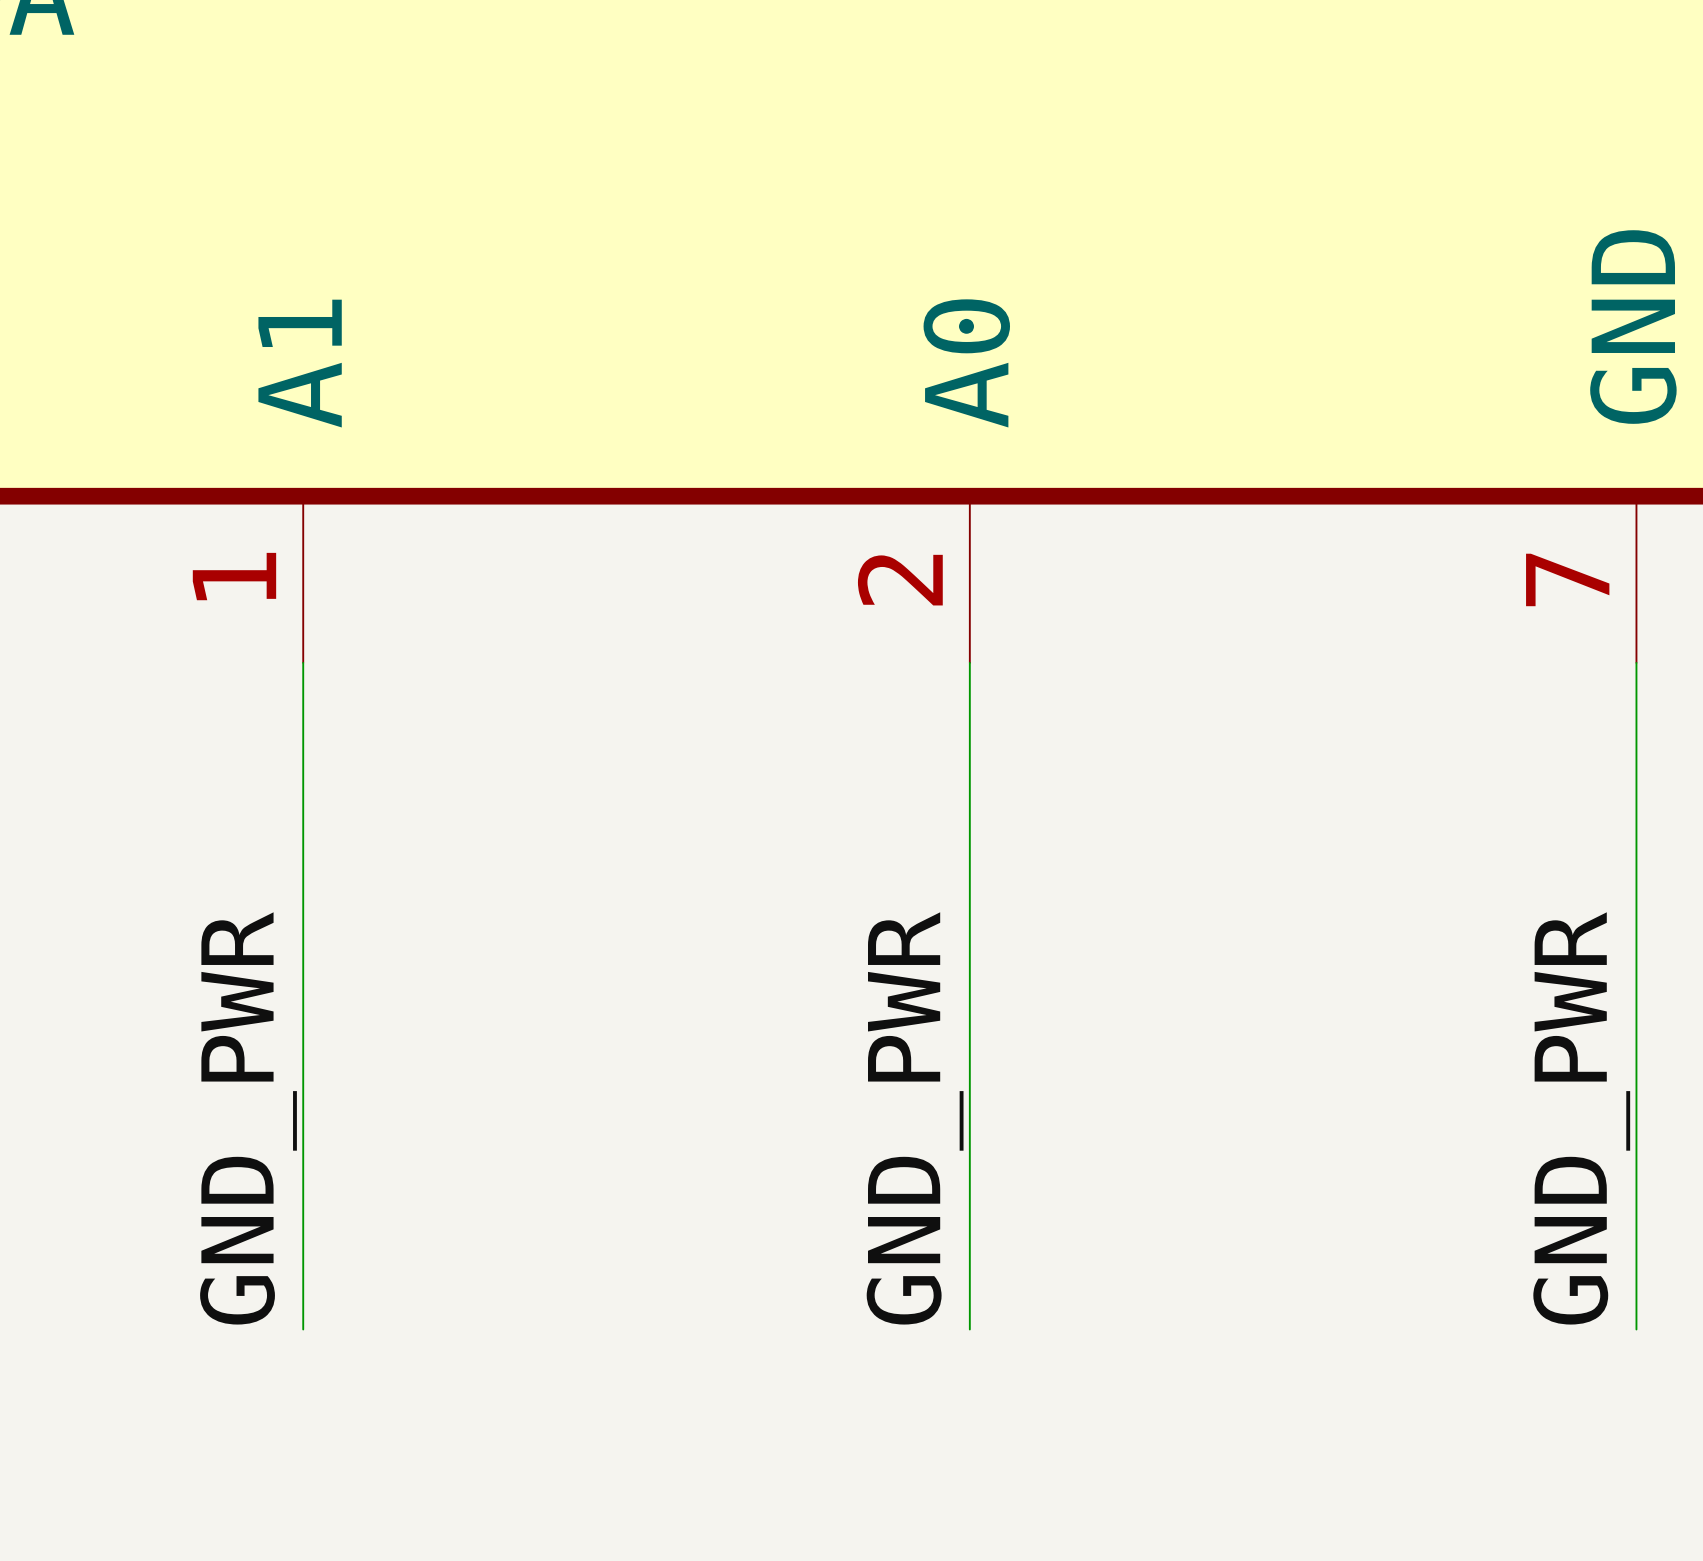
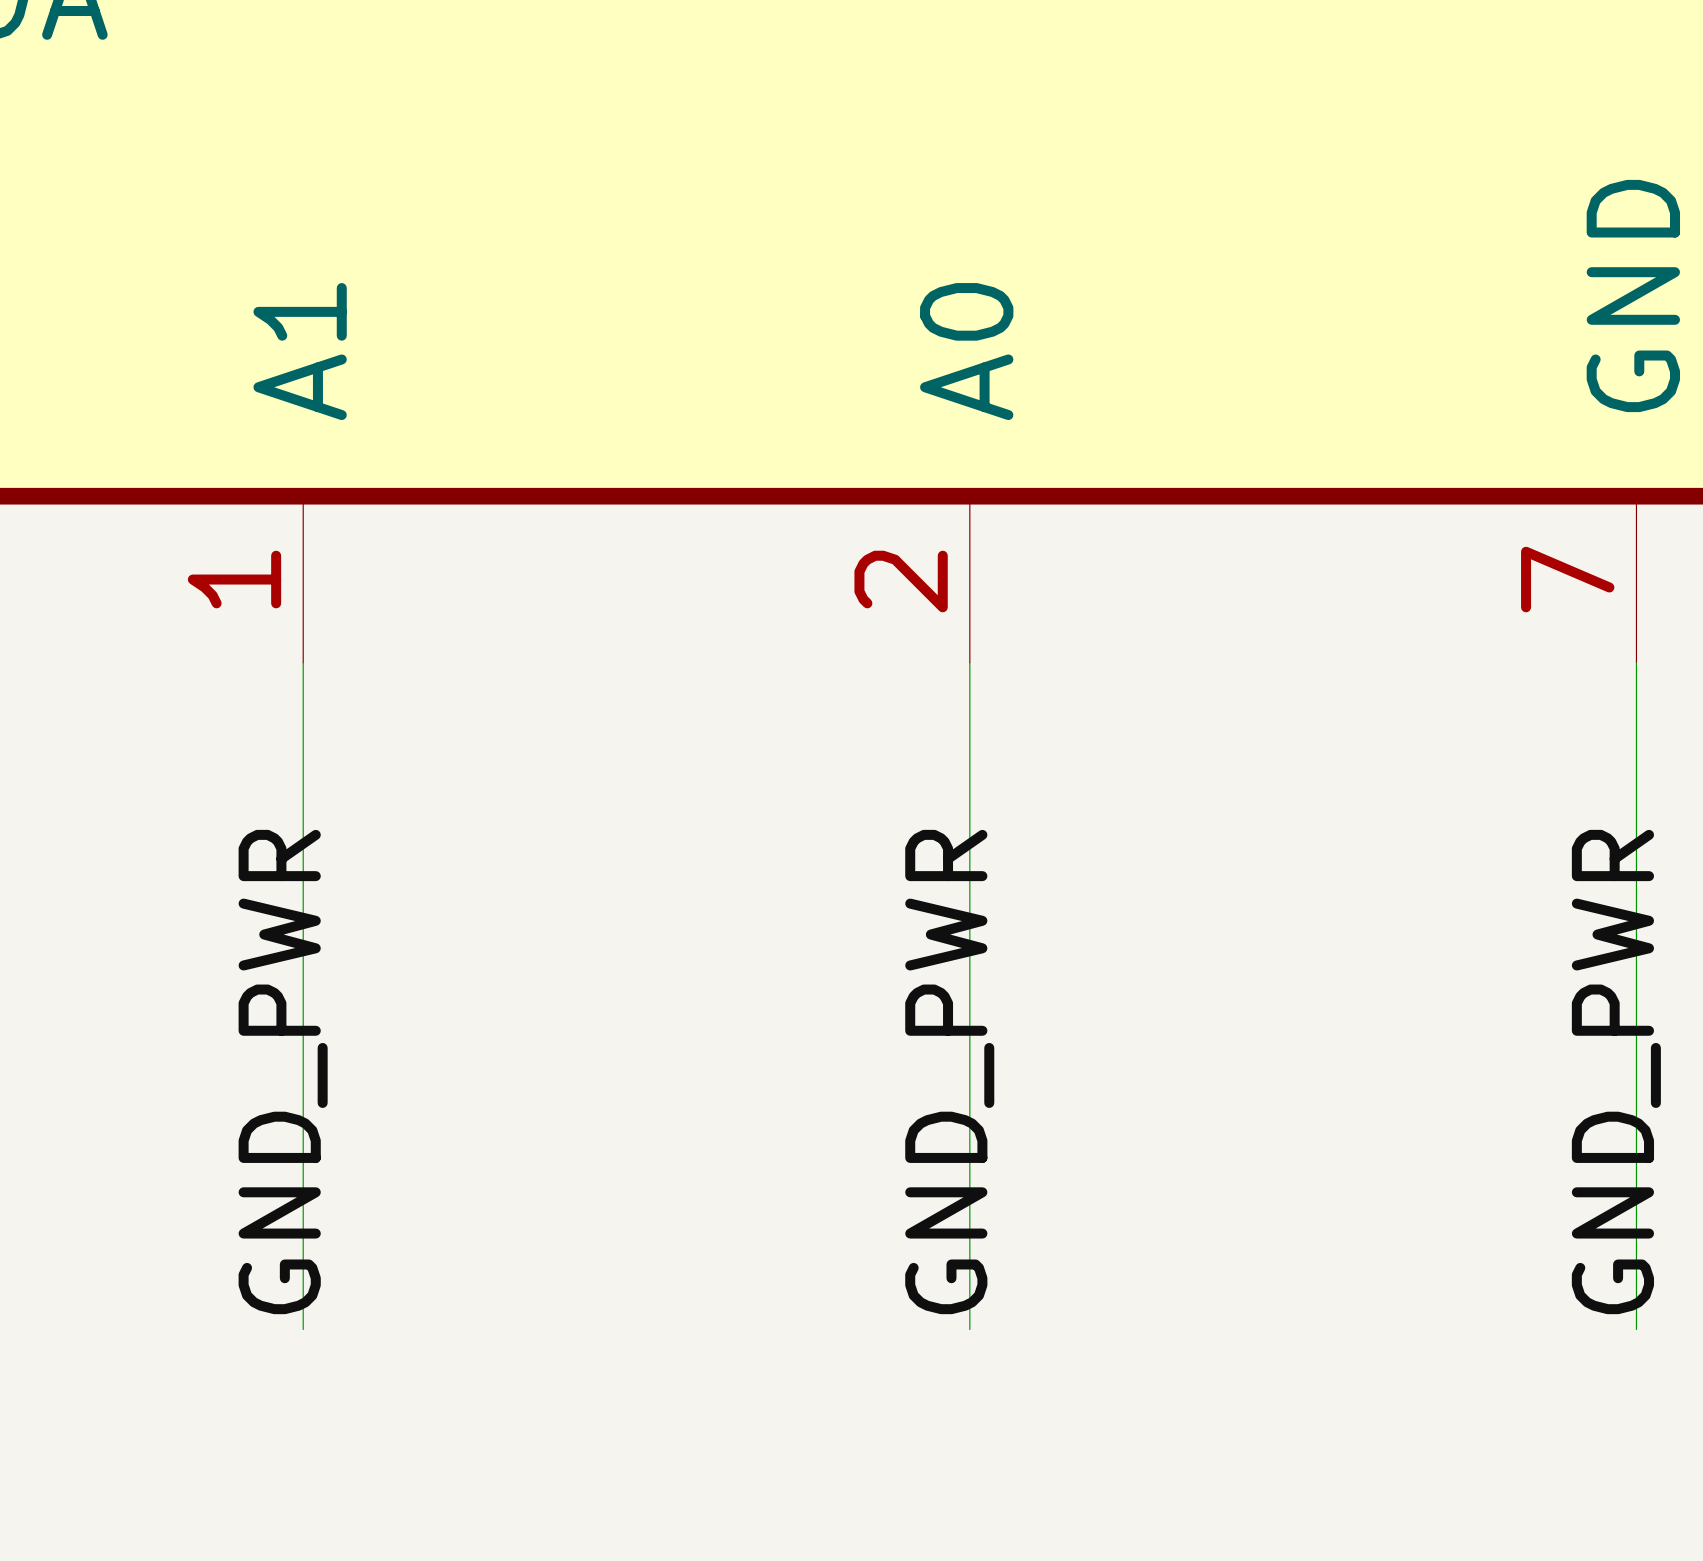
label position: GND_PWR (248, 1118) -> GND_PWR (283, 1072)
label position: GND_PWR (915, 1118) -> GND_PWR (949, 1072)
label position: GND_PWR (1581, 1118) -> GND_PWR (1616, 1072)

